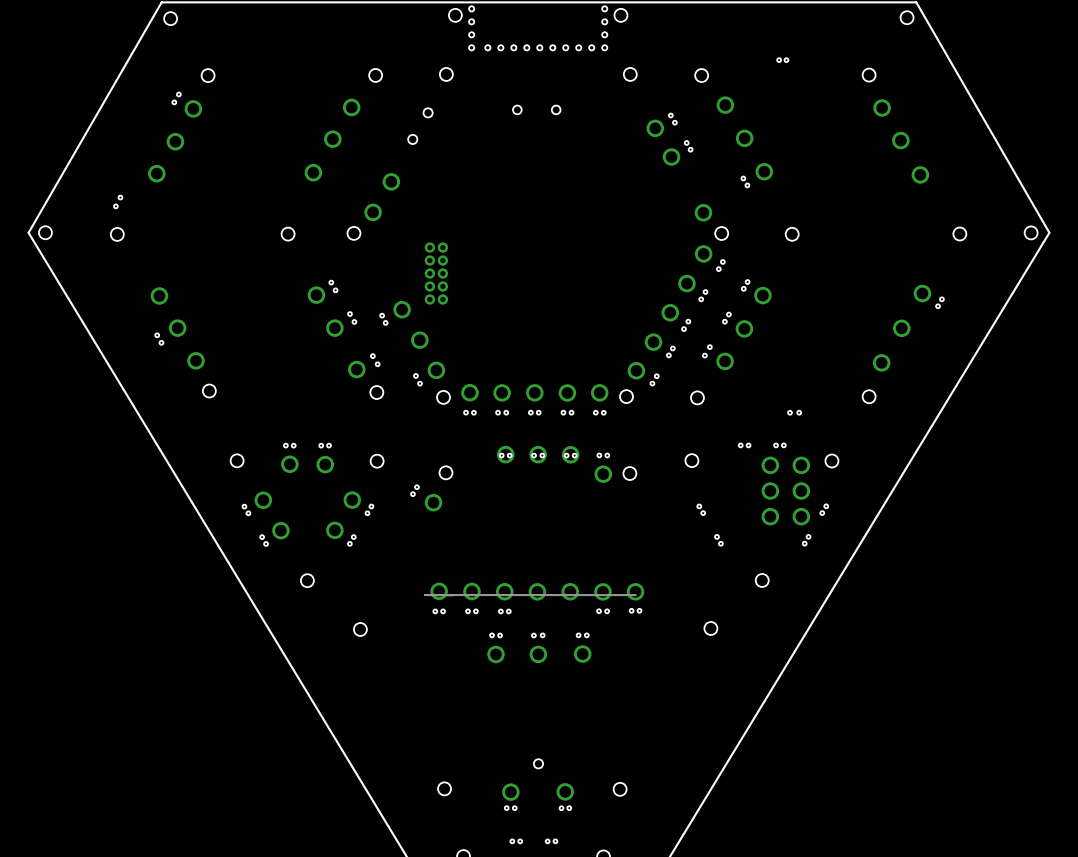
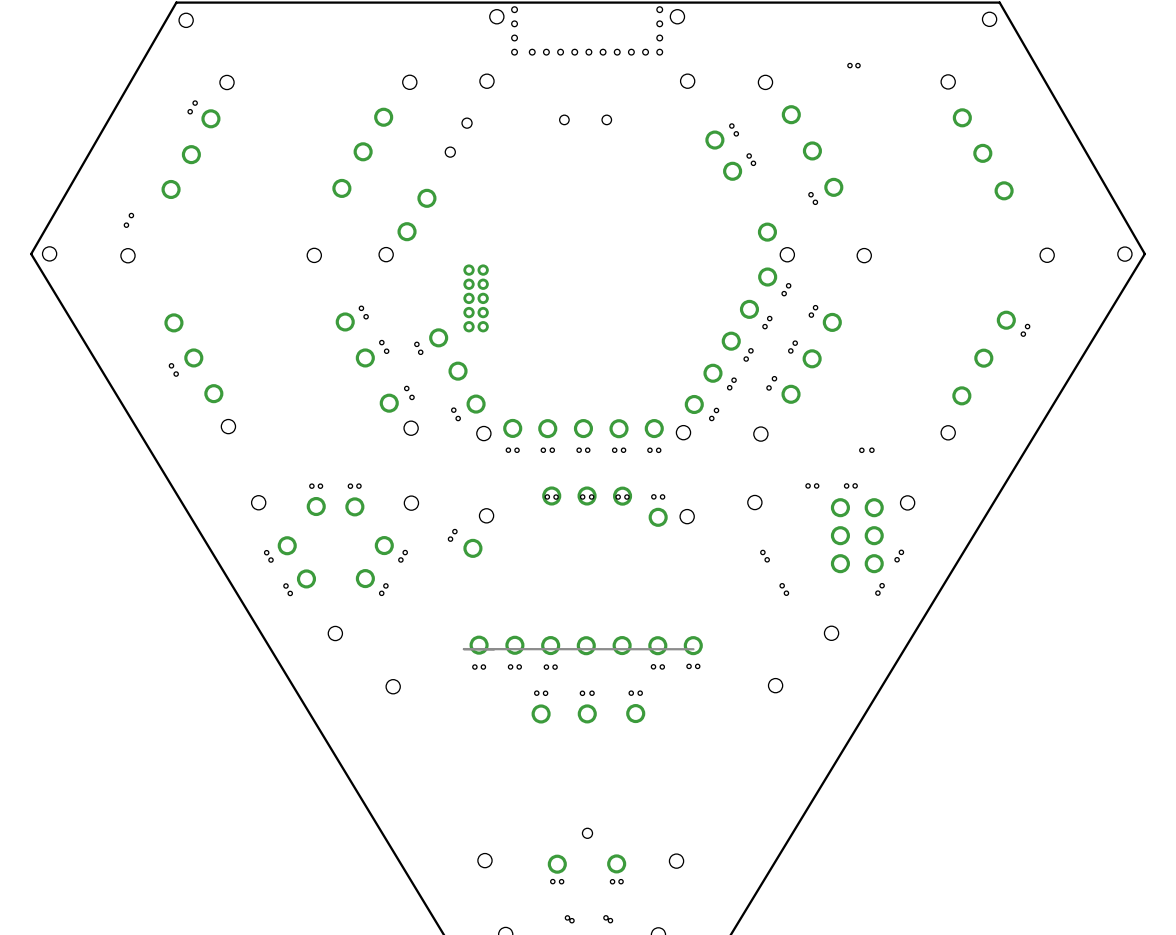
hole: (512, 841) -> none
hole: (547, 841) -> none
hole: none -> (571, 920)
hole: none -> (610, 920)

